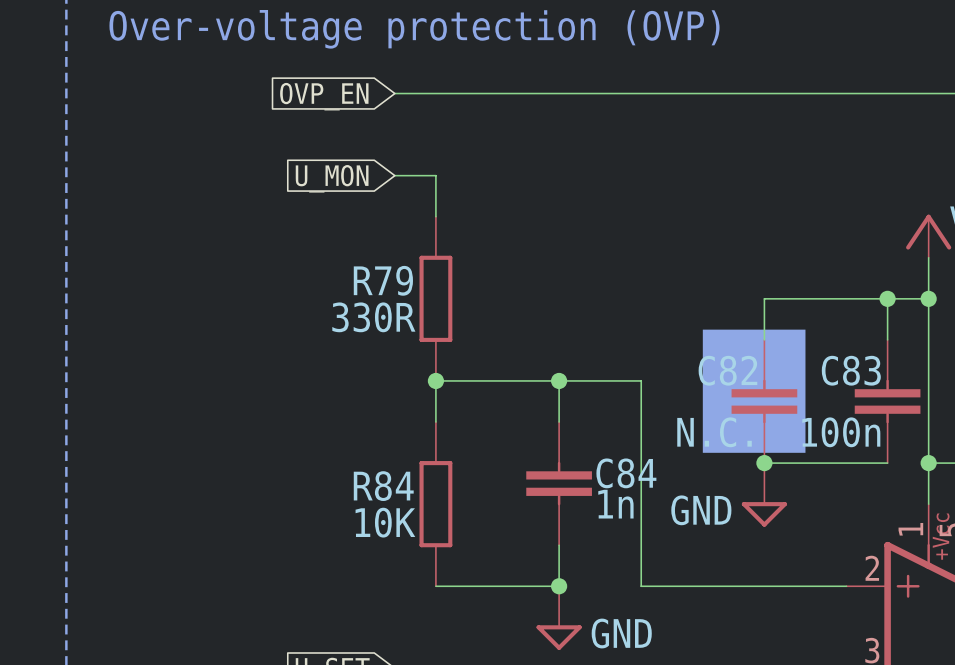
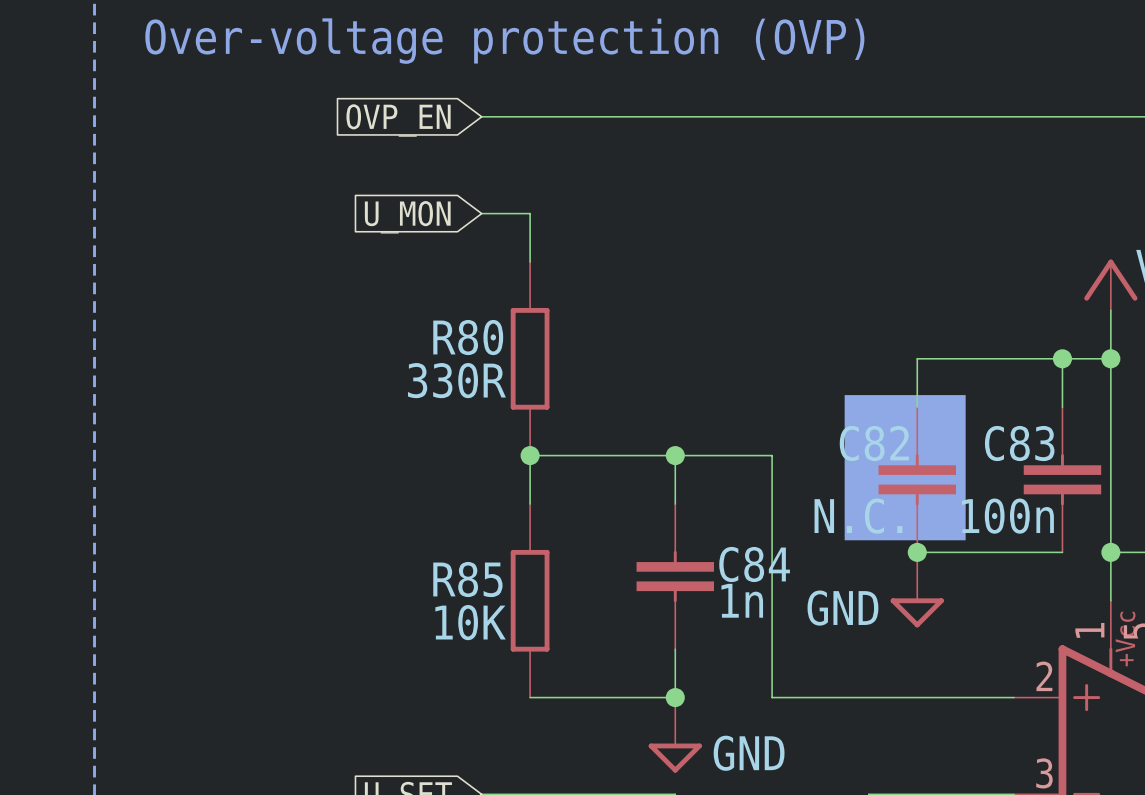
R79 name: R79 (383, 280) -> R80 (468, 337)
R84 name: R84 (383, 486) -> R85 (467, 579)

